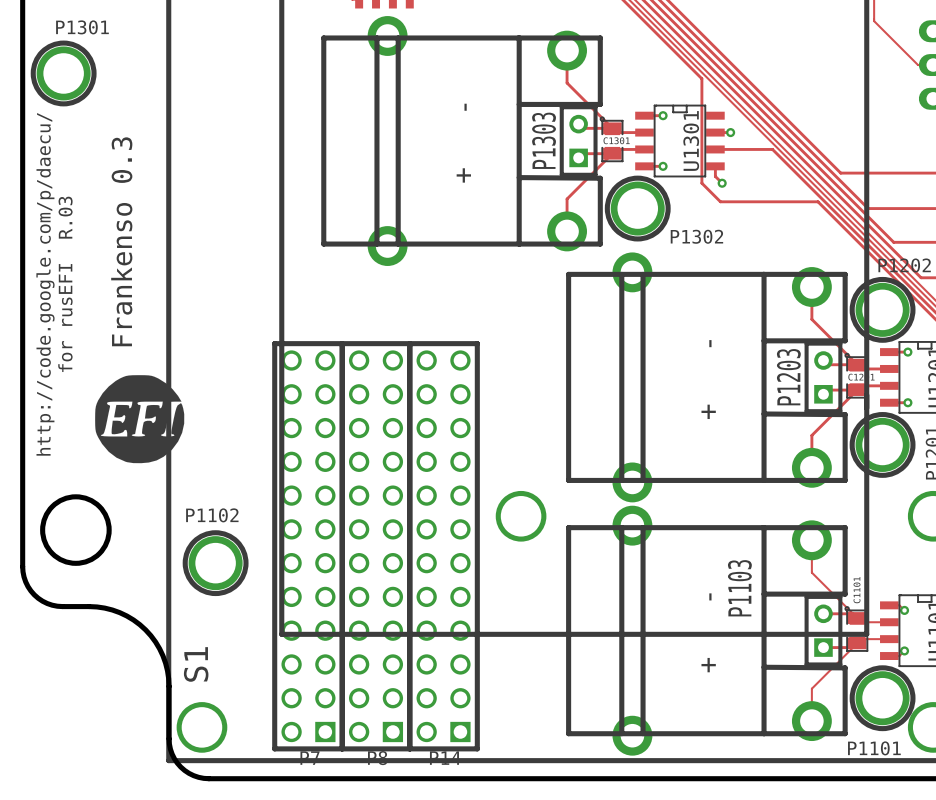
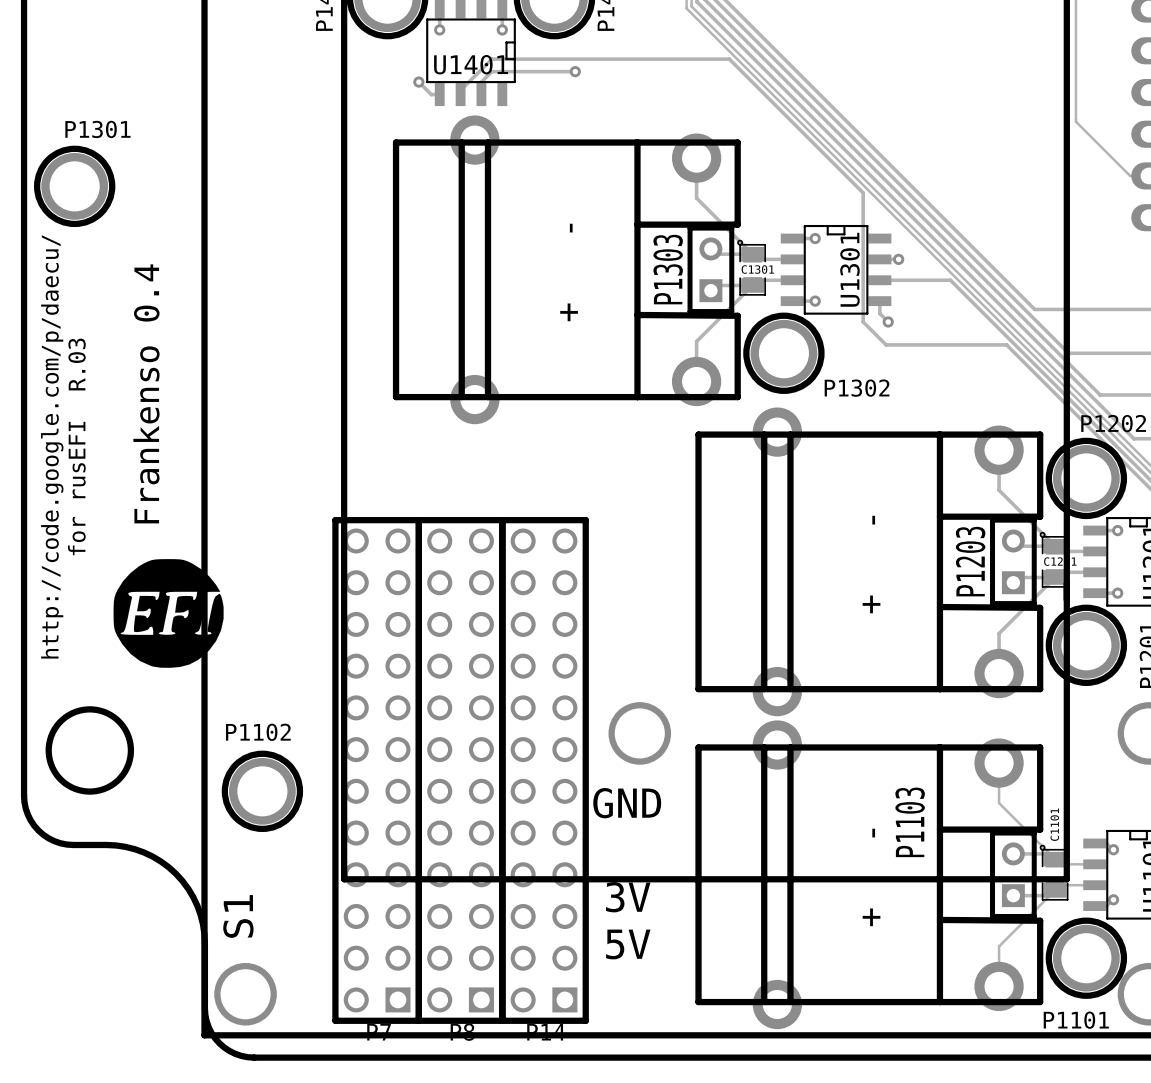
text: Frankenso 0.3 (121, 241) -> Frankenso 0.4 (146, 393)
text: none -> GND (627, 803)
text: none -> 3V (628, 897)
text: none -> 5V (628, 944)

